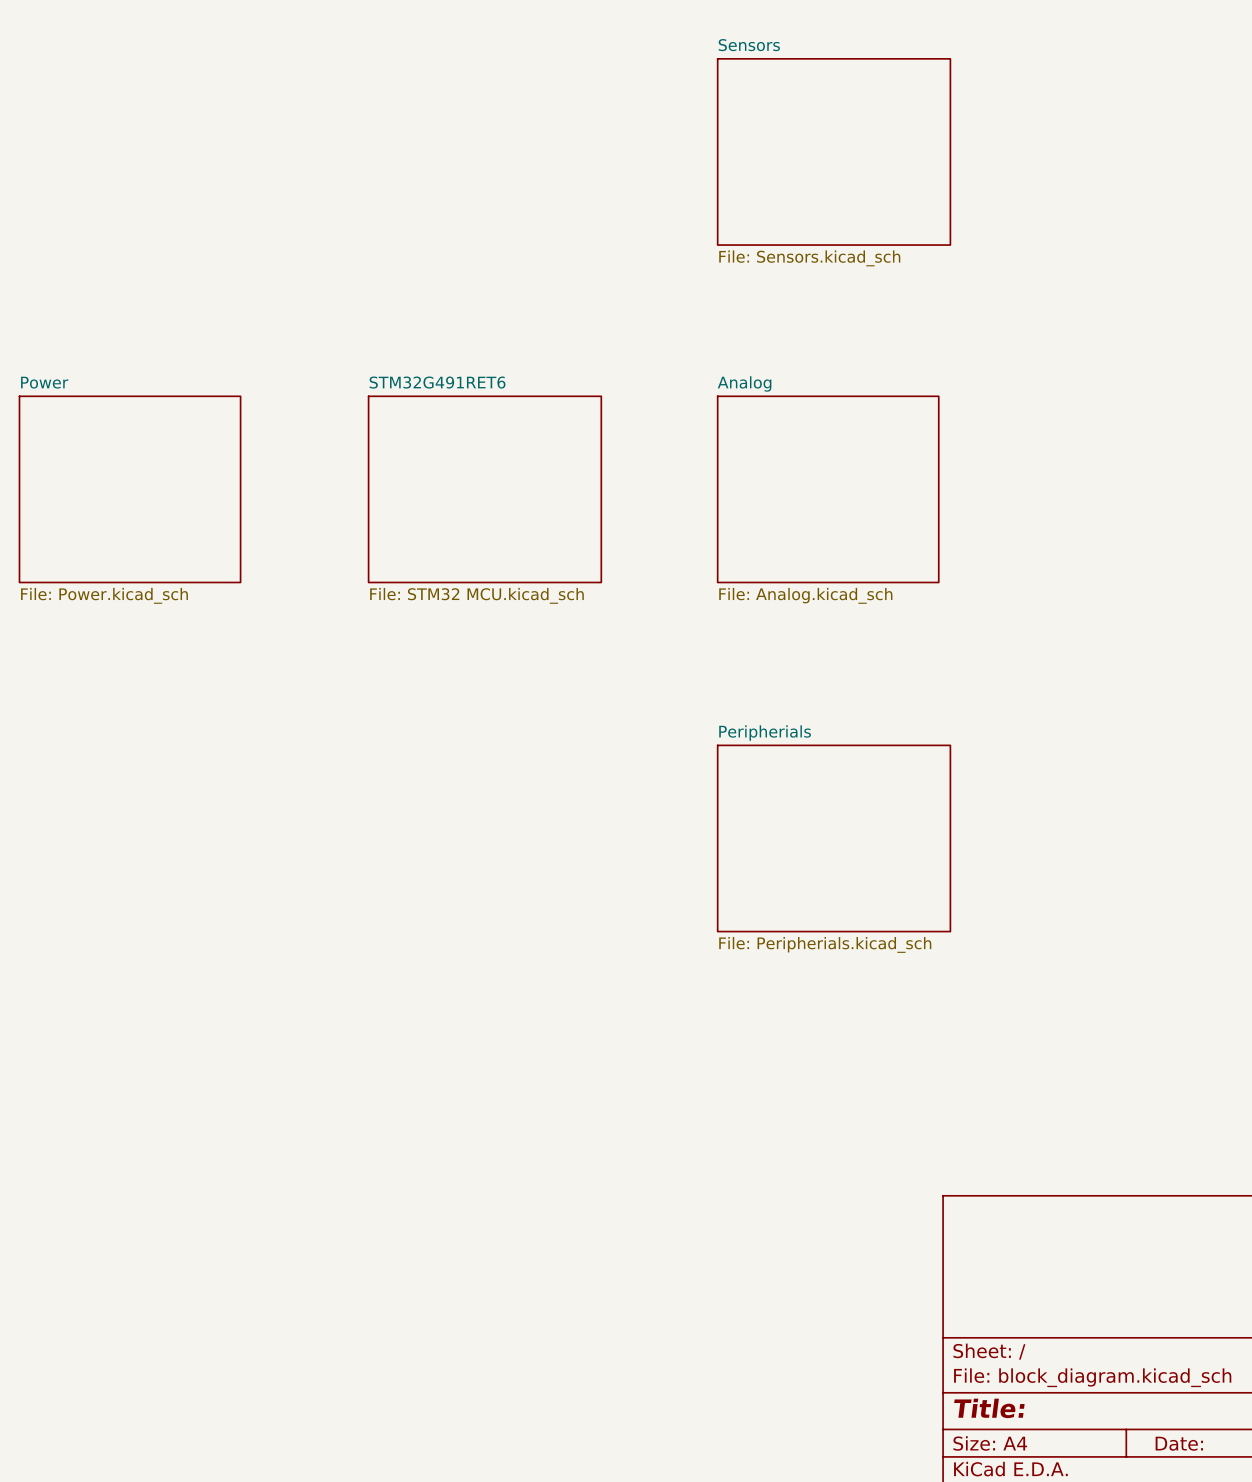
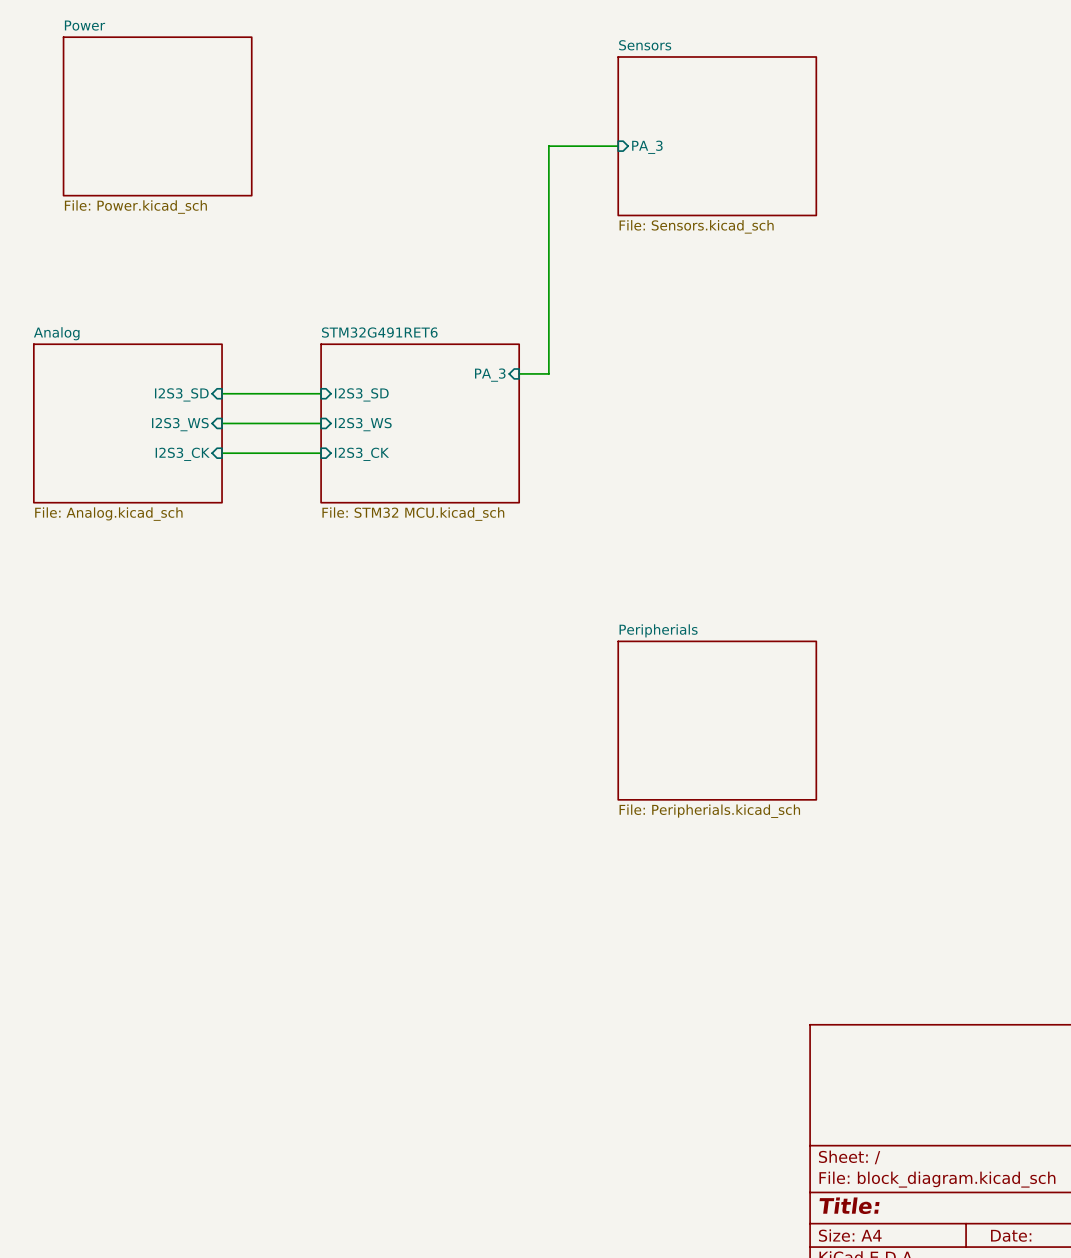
sheet Power: none -> File: Power.kicad_sch (157, 116)
wire: none -> (618, 146) (548, 146) (548, 373) (519, 373)
sheet pin: none -> PA_3 (647, 147)
sheet pin: none -> PA_3 (490, 375)
wire: none -> (222, 393) (321, 393)
sheet pin: none -> I2S3_SD (181, 394)
sheet pin: none -> I2S3_SD (361, 394)
sheet Power: File: Power.kicad_sch (130, 489) -> none
sheet Analog: none -> File: Analog.kicad_sch (127, 423)
wire: none -> (222, 423) (321, 423)
sheet Analog: File: Analog.kicad_sch (828, 489) -> none
sheet pin: none -> I2S3_WS (180, 424)
sheet pin: none -> I2S3_WS (363, 424)
wire: none -> (222, 453) (321, 453)
sheet pin: none -> I2S3_CK (182, 454)
sheet pin: none -> I2S3_CK (362, 454)

